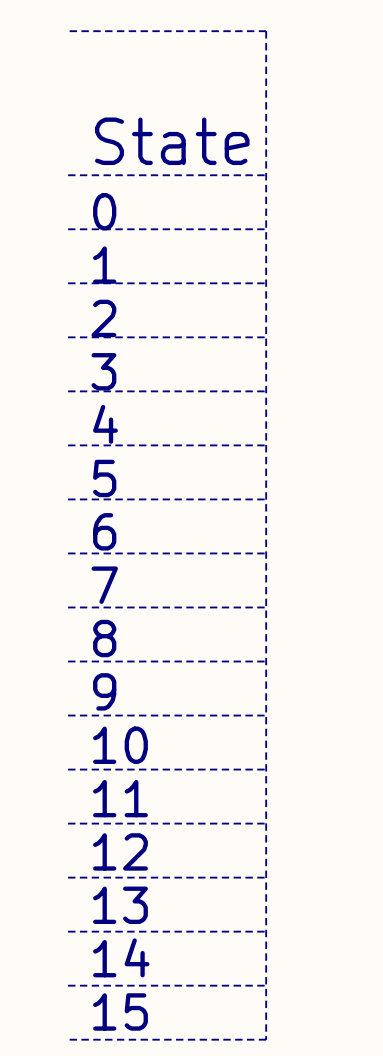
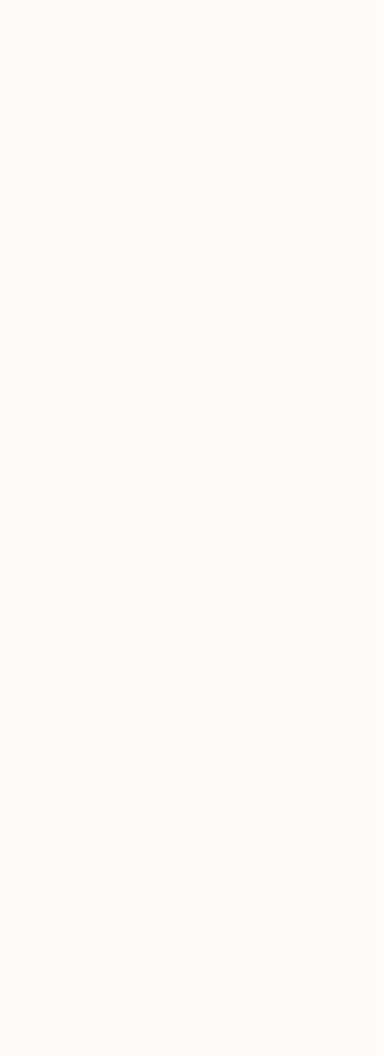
line: (68, 31) (266, 31) (266, 1039) (68, 1039) -> none
text: State (172, 141) -> none
line: (68, 175) (266, 175) -> none
text: 0 (104, 211) -> none
line: (68, 229) (266, 229) -> none
text: 1 (104, 265) -> none
line: (68, 283) (266, 283) -> none
text: 2 (103, 318) -> none
line: (68, 337) (266, 337) -> none
text: 3 (103, 371) -> none
line: (68, 391) (266, 391) -> none
text: 4 (105, 424) -> none
line: (68, 445) (266, 445) -> none
text: 5 (104, 478) -> none
line: (68, 499) (266, 499) -> none
text: 6 (104, 531) -> none
line: (68, 553) (266, 553) -> none
text: 7 (104, 585) -> none
line: (68, 607) (266, 607) -> none
text: 8 (104, 638) -> none
line: (68, 661) (266, 661) -> none
text: 9 (104, 691) -> none
line: (68, 715) (266, 715) -> none
text: 10 (120, 745) -> none
line: (68, 769) (266, 769) -> none
text: 11 (120, 798) -> none
line: (68, 823) (266, 823) -> none
text: 12 (120, 851) -> none
line: (68, 877) (266, 877) -> none
text: 13 (120, 905) -> none
line: (68, 931) (266, 931) -> none
text: 14 (121, 957) -> none
line: (68, 985) (266, 985) -> none
text: 15 (120, 1011) -> none

